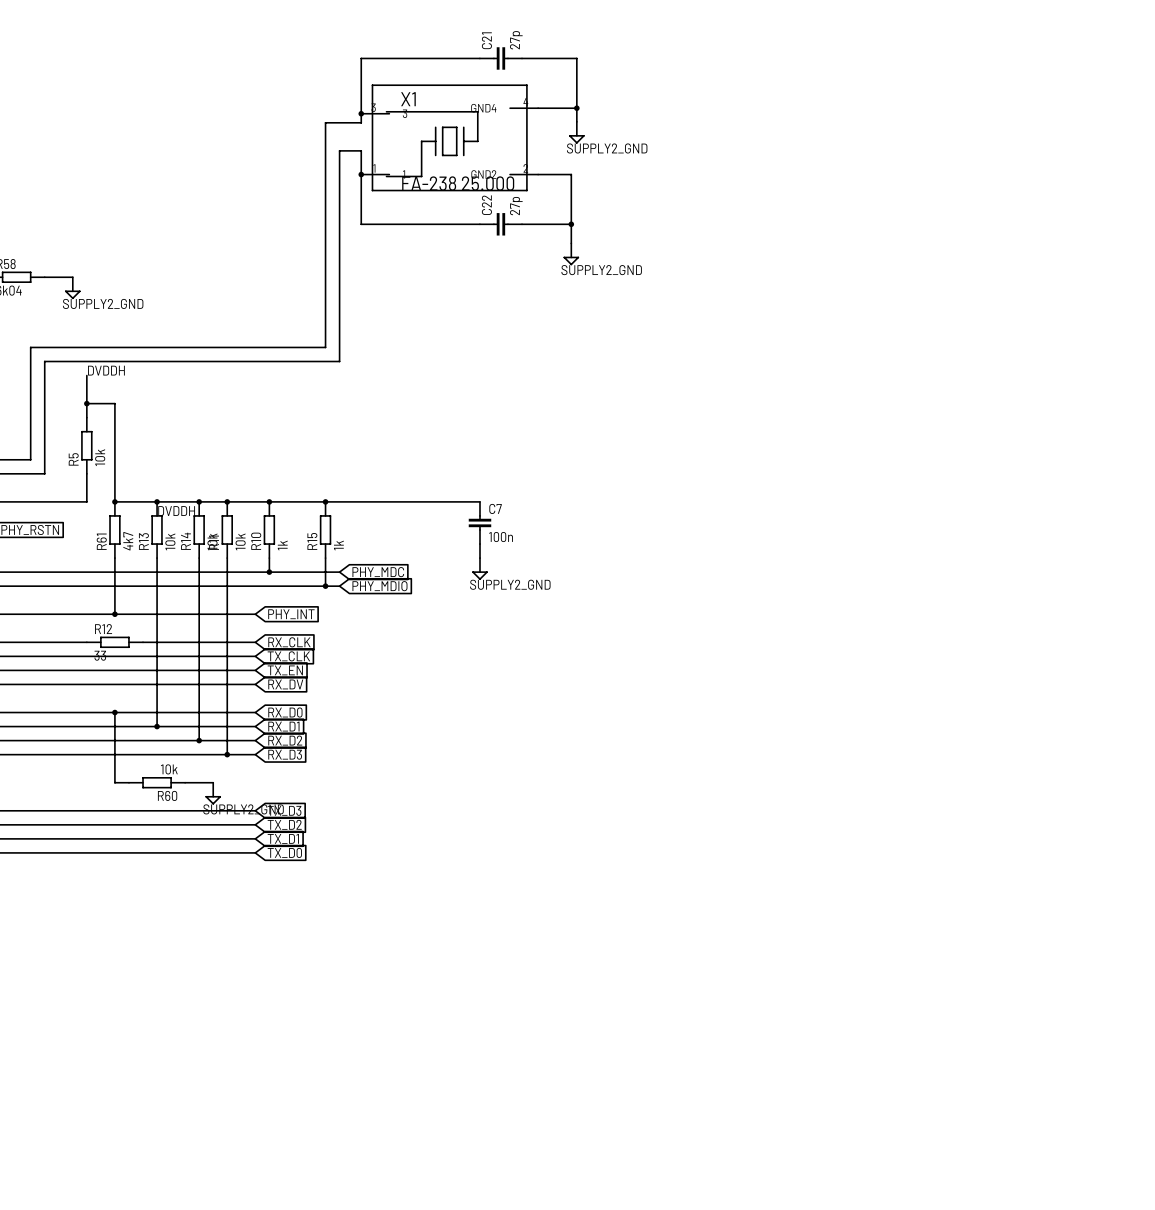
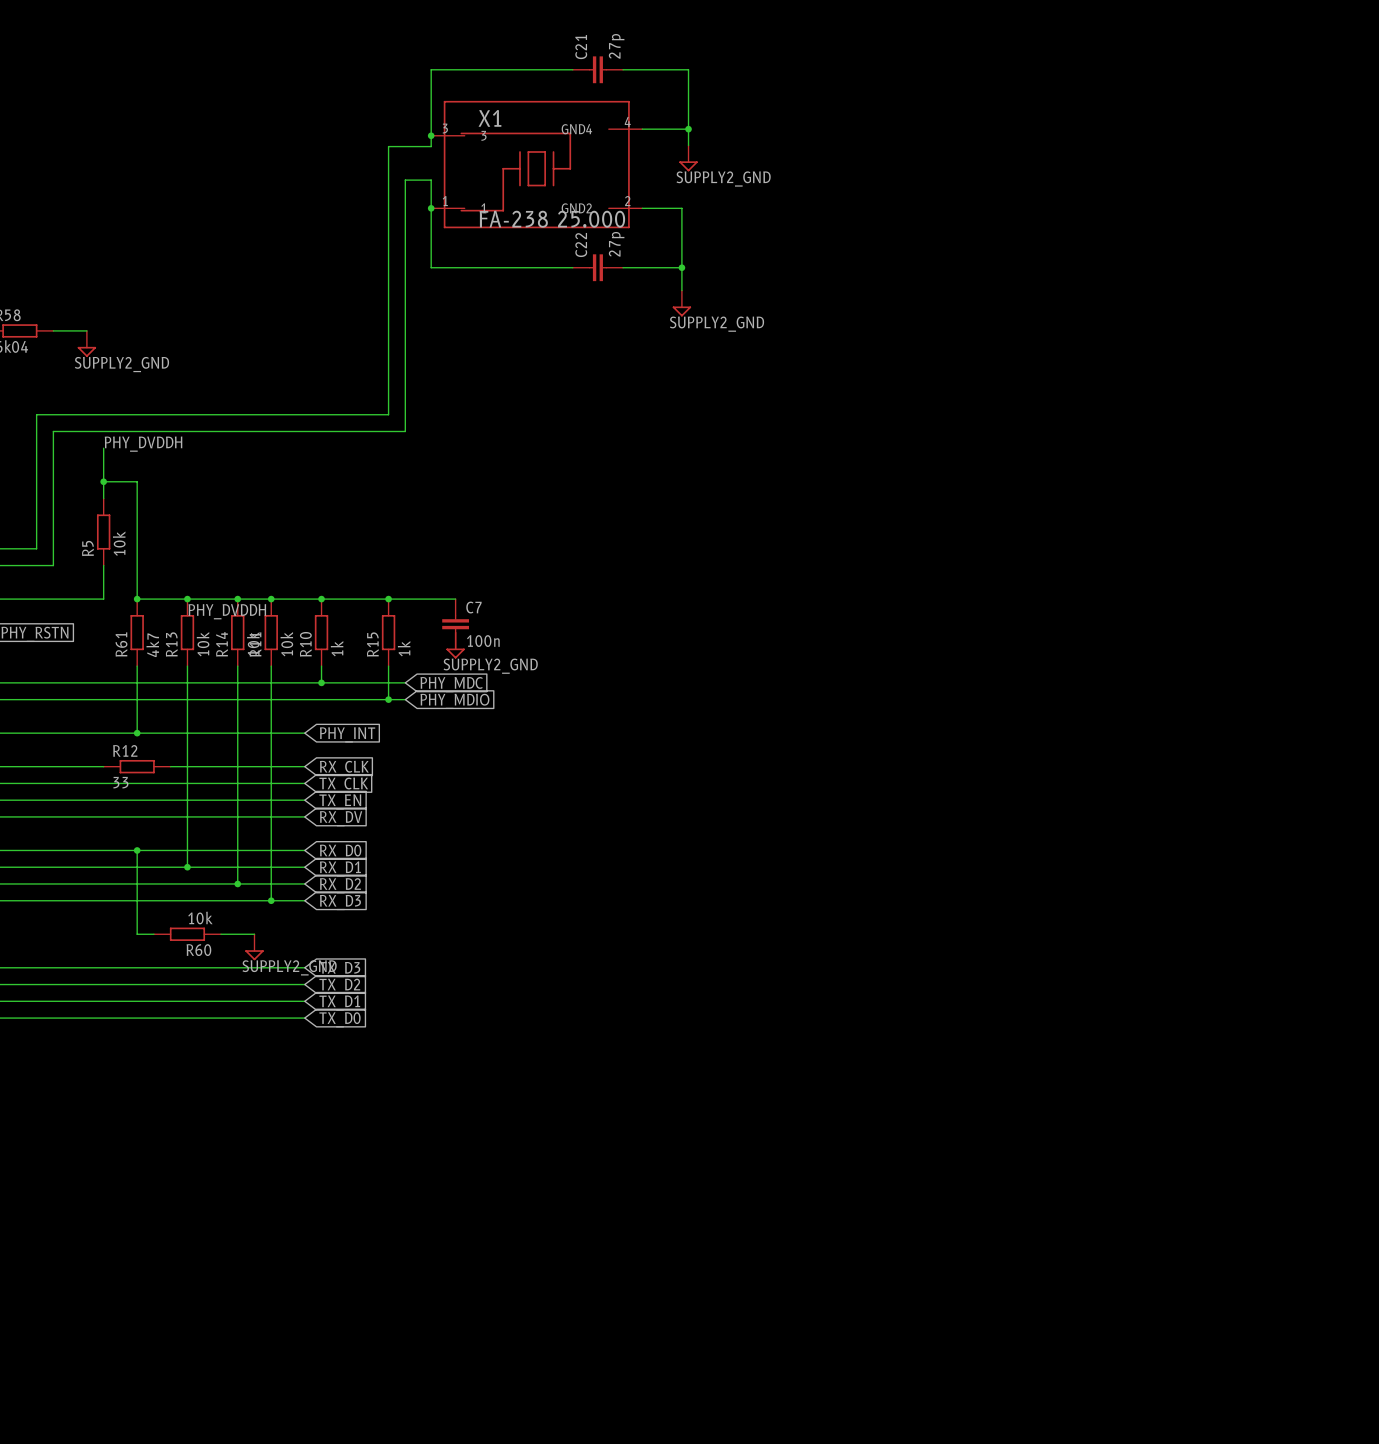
label: DVDDH (106, 370) -> PHY_DVDDH (143, 444)
wire: (381, 501) (479, 501) -> none
label: DVDDH (176, 511) -> PHY_DVDDH (227, 611)
C7 position: (479, 522) -> (455, 624)
wire: (479, 544) (479, 558) -> none
power symbol position: SUPPLY2_GND (479, 568) -> SUPPLY2_GND (455, 645)

